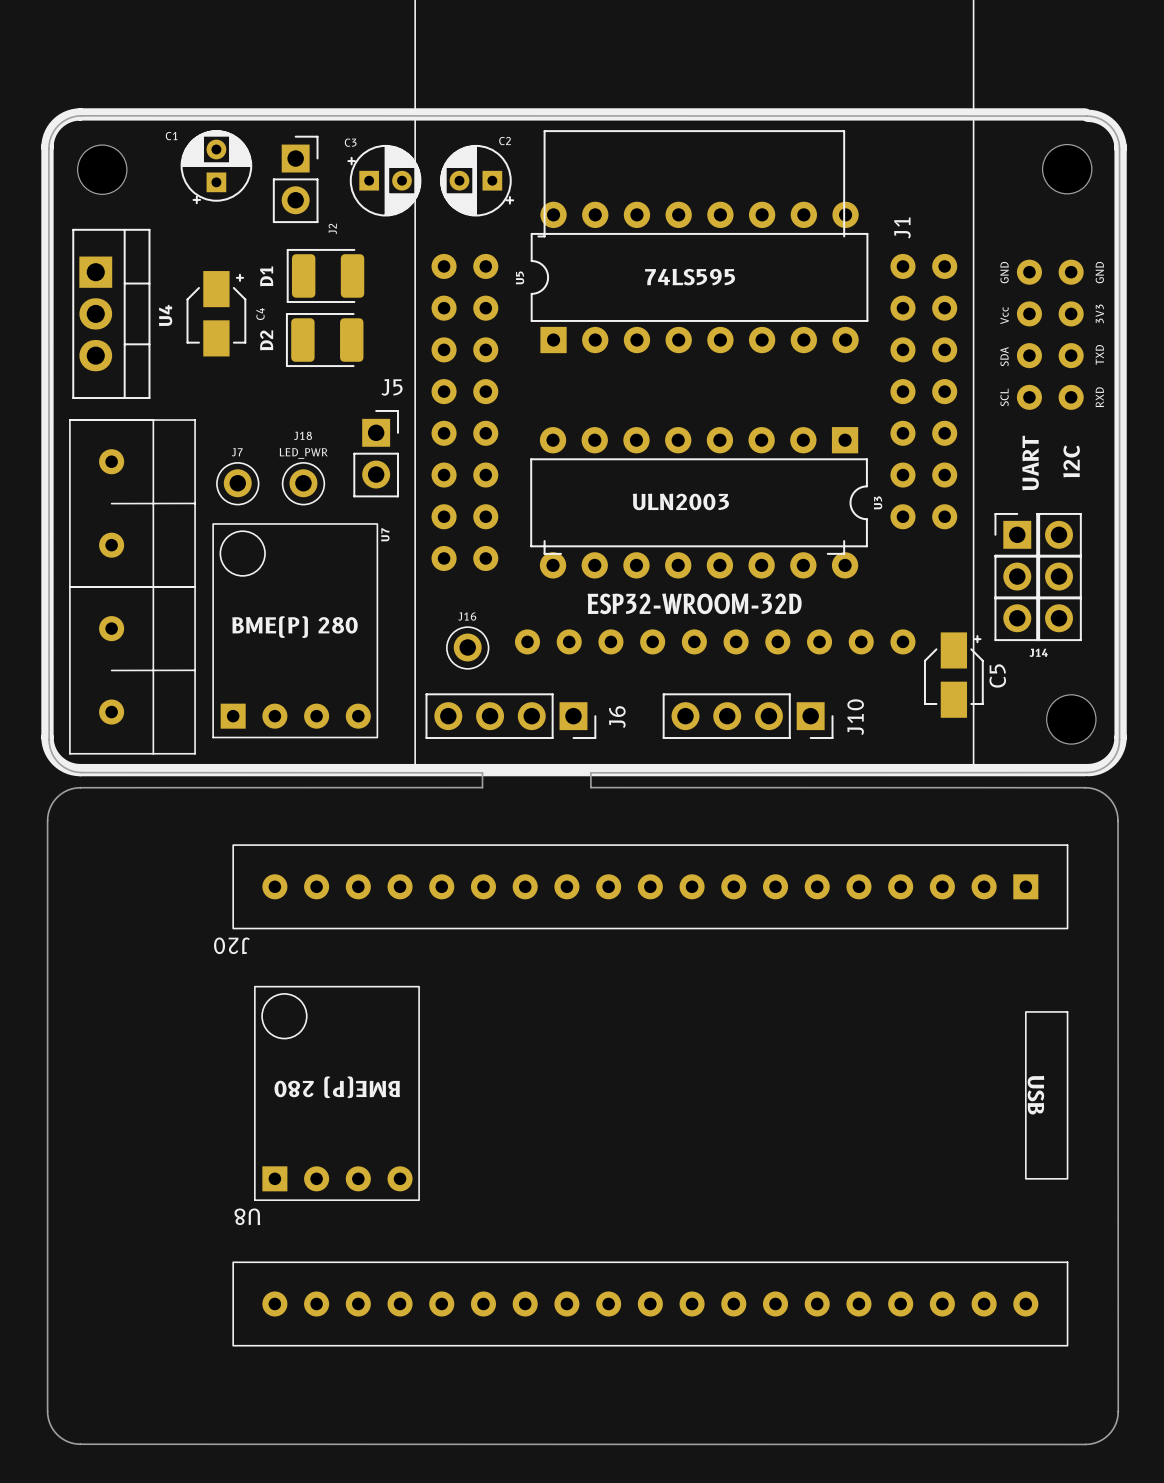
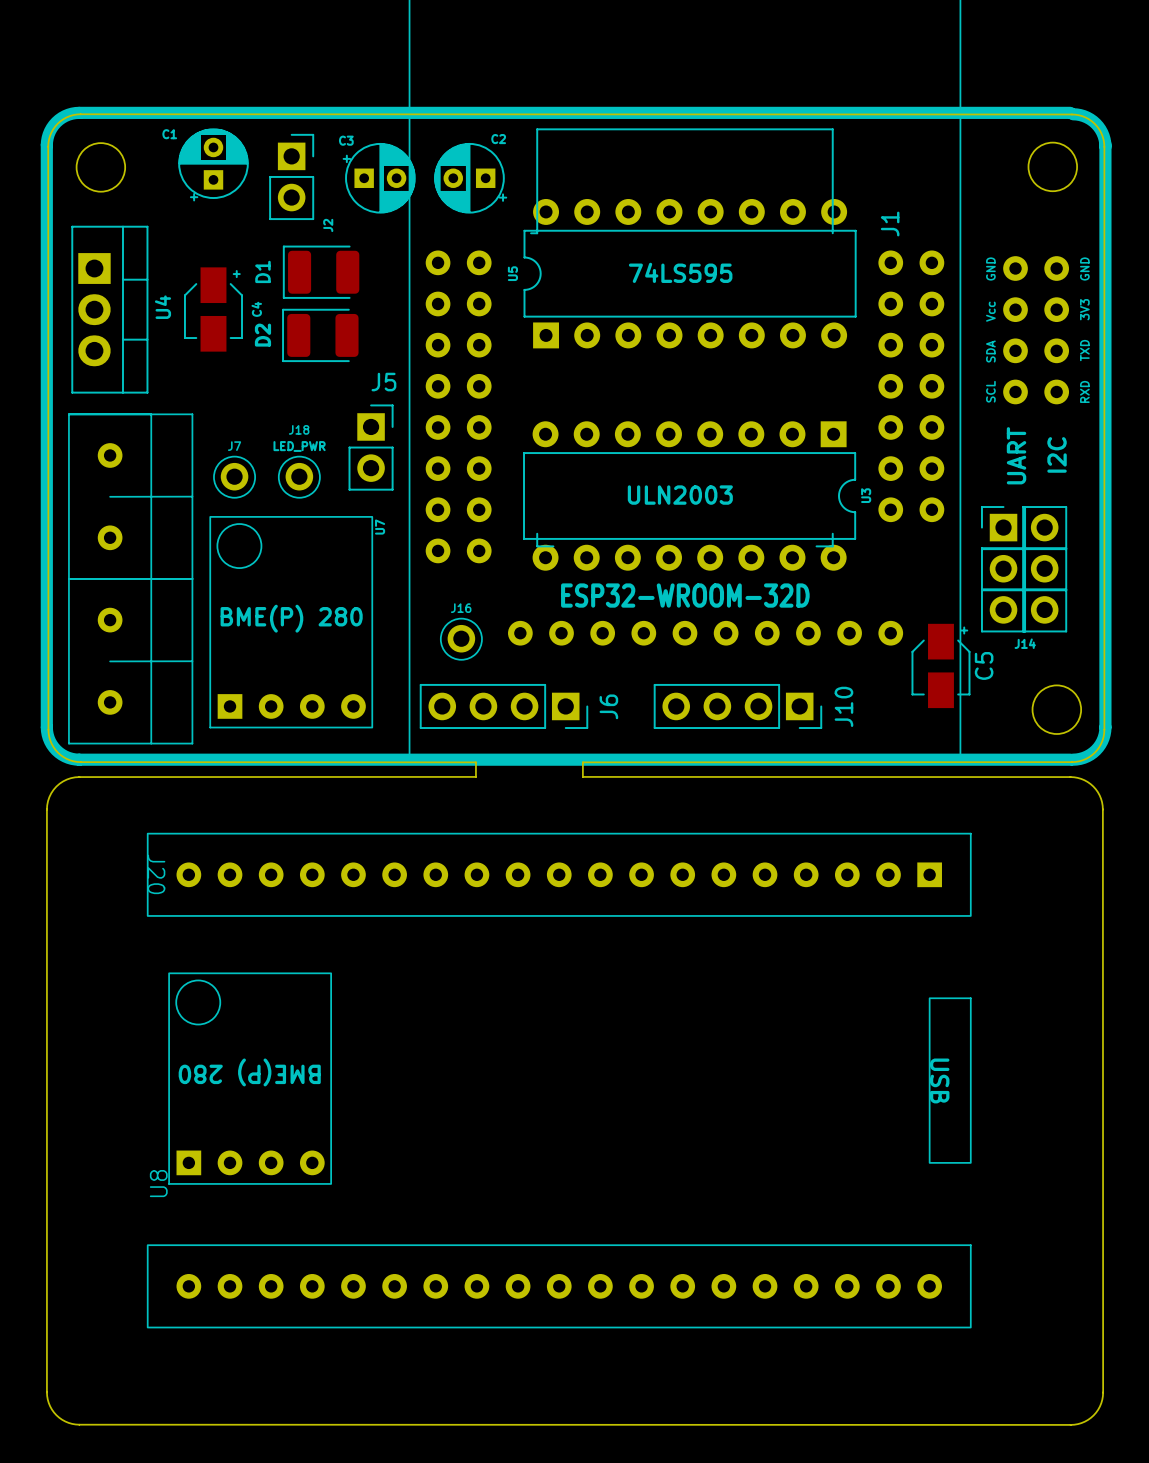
J20 name rotation: 0° (231, 945) -> 90° counterclockwise (156, 874)
J20 name position: J20 (231, 945) -> J20 (156, 874)
U8 position: (336, 1093) -> (250, 1078)
J20 position: (650, 1095) -> (559, 1080)
U8 name rotation: 0° (247, 1216) -> 90° clockwise (158, 1183)

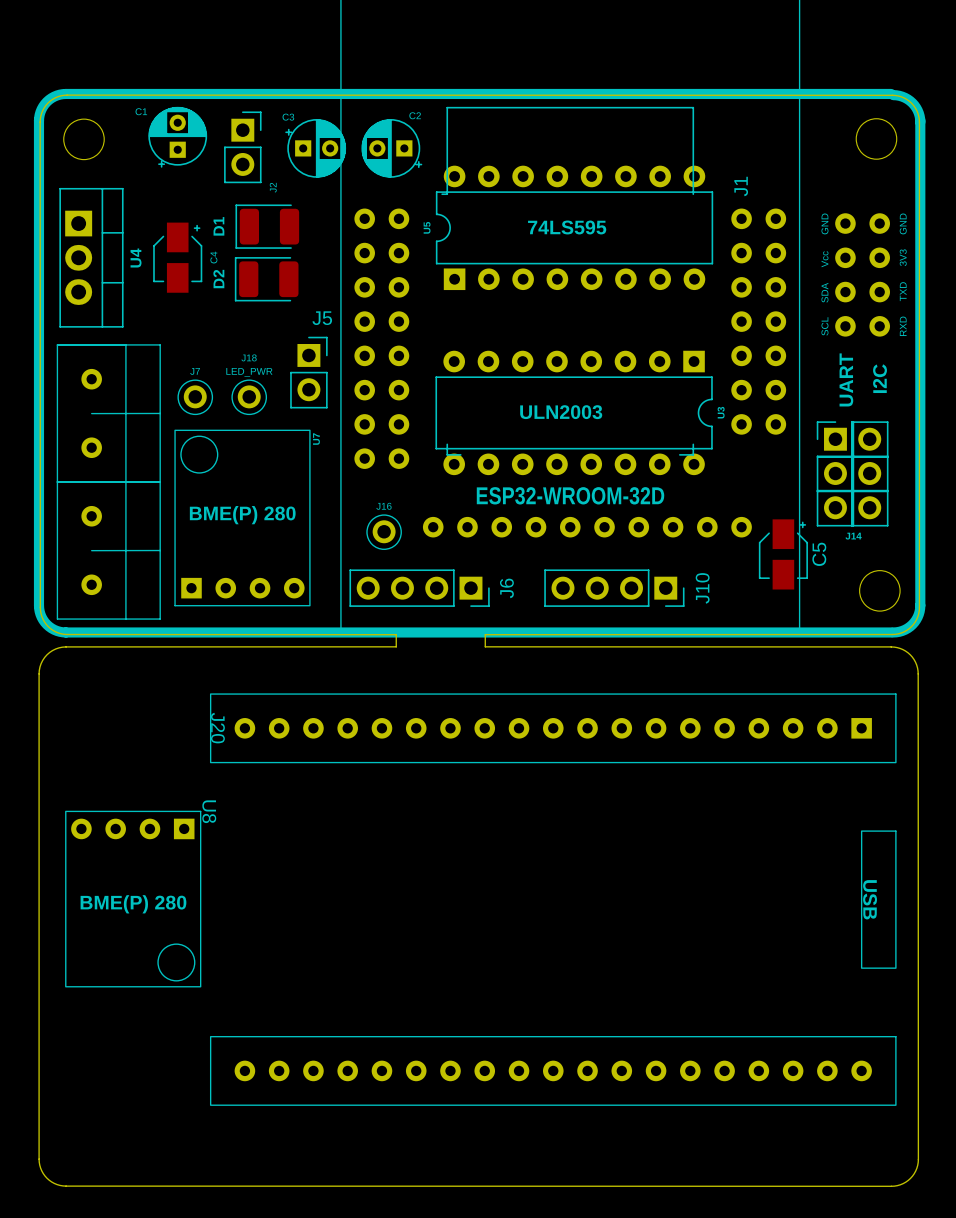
U8 rotation: 0° (250, 1078) -> 180° (133, 899)
J20 position: (559, 1080) -> (553, 899)

